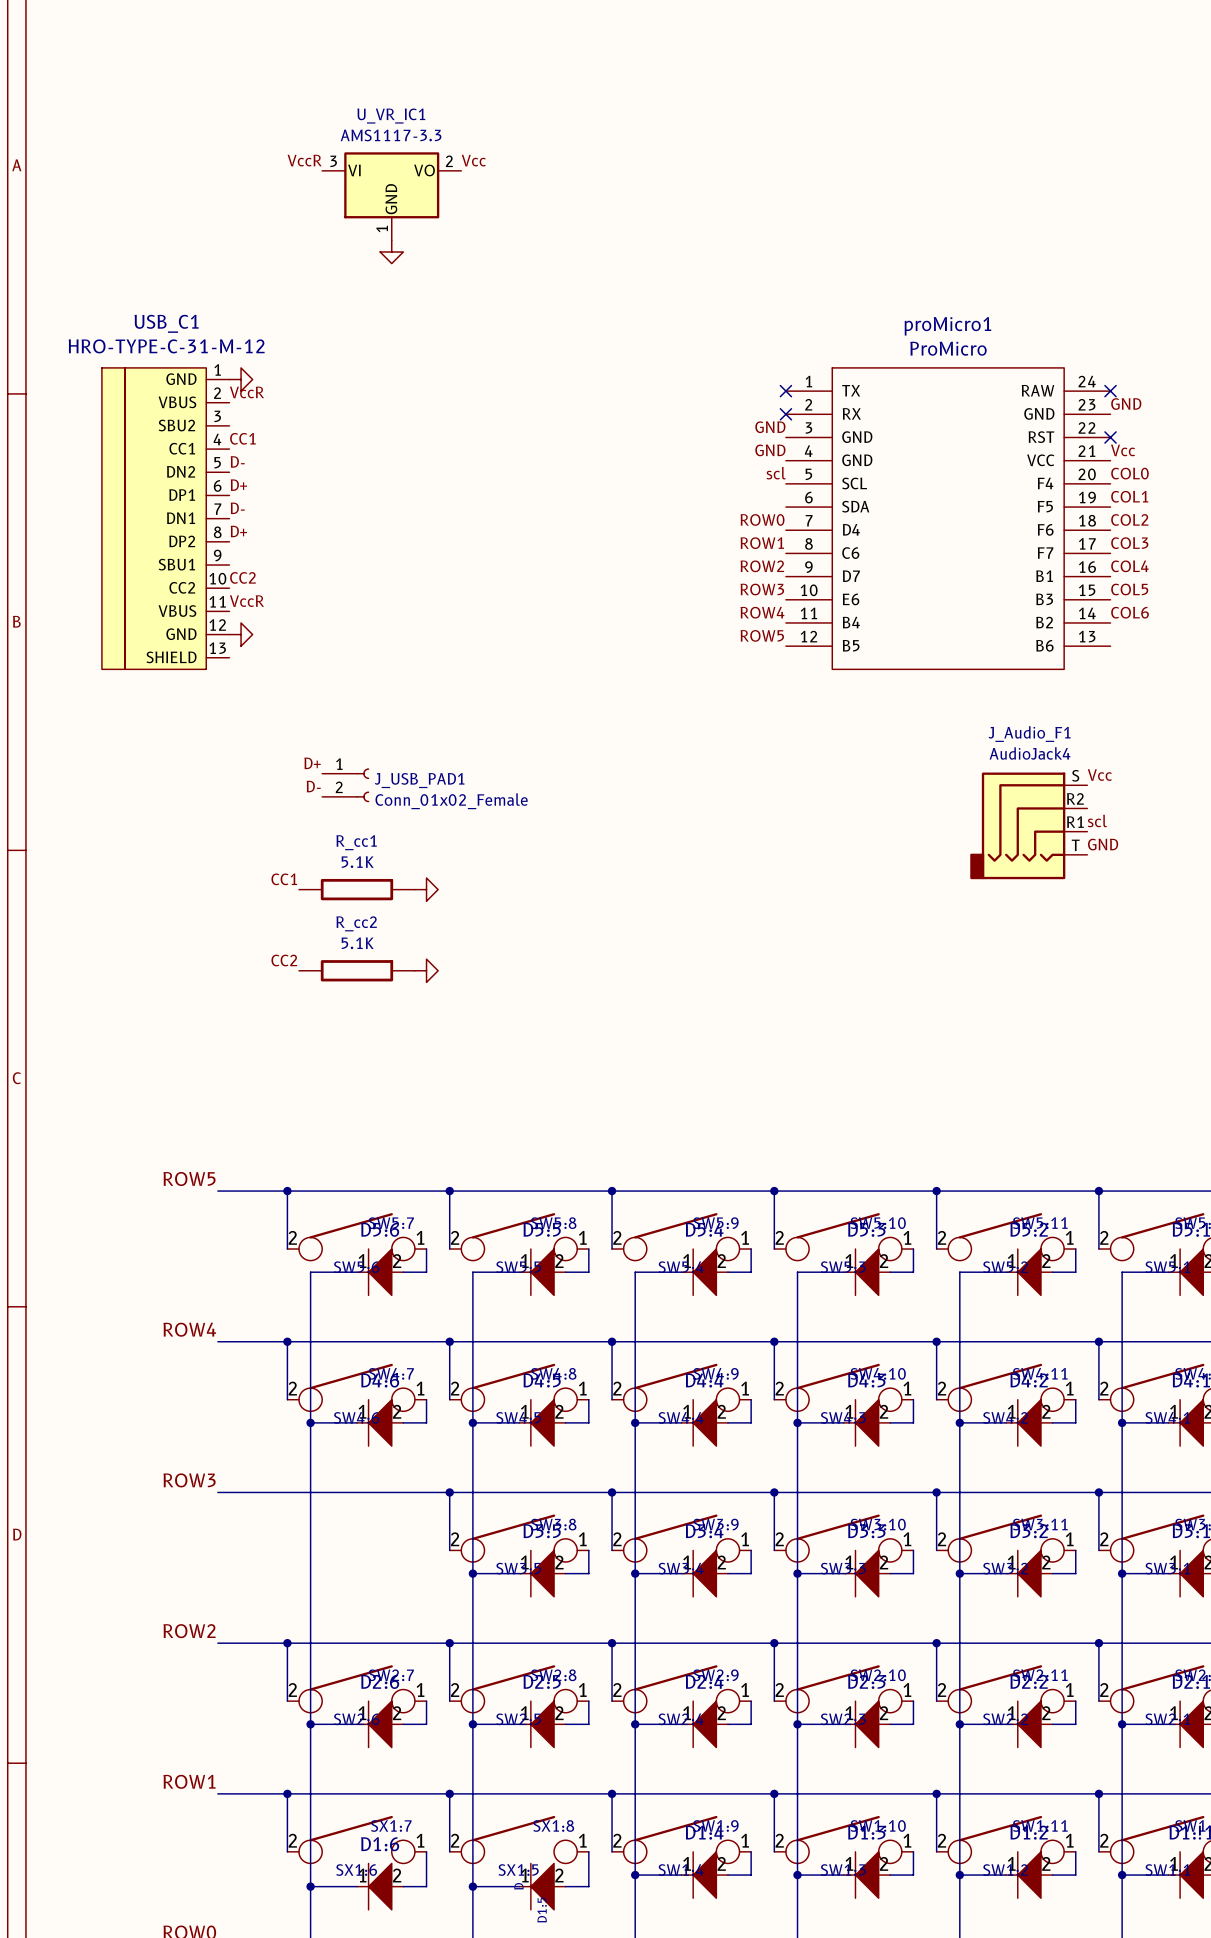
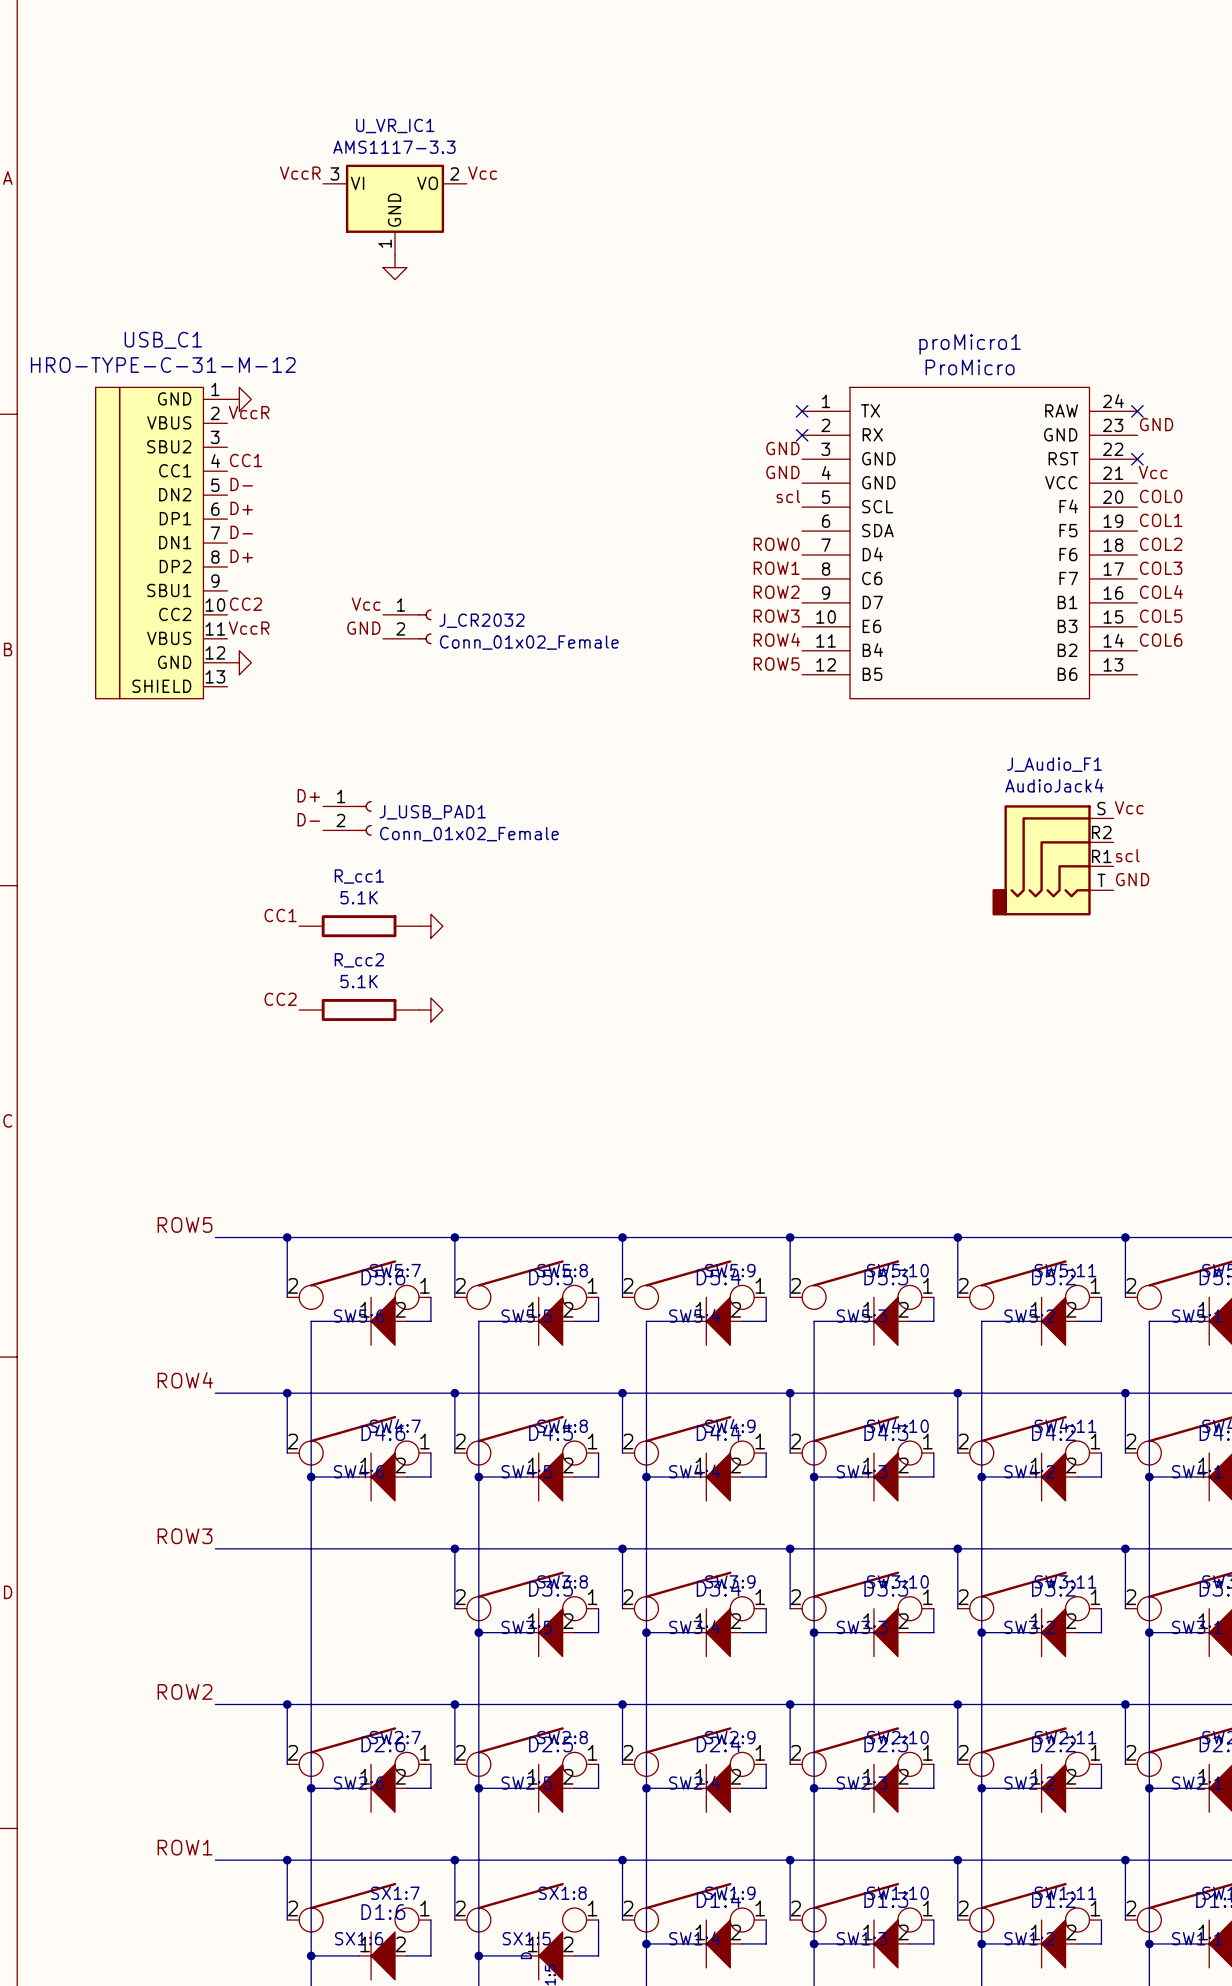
label: none -> Vcc (366, 604)
J_CR2032: none -> Conn_01x02_Female (407, 626)
label: none -> GND (363, 628)

